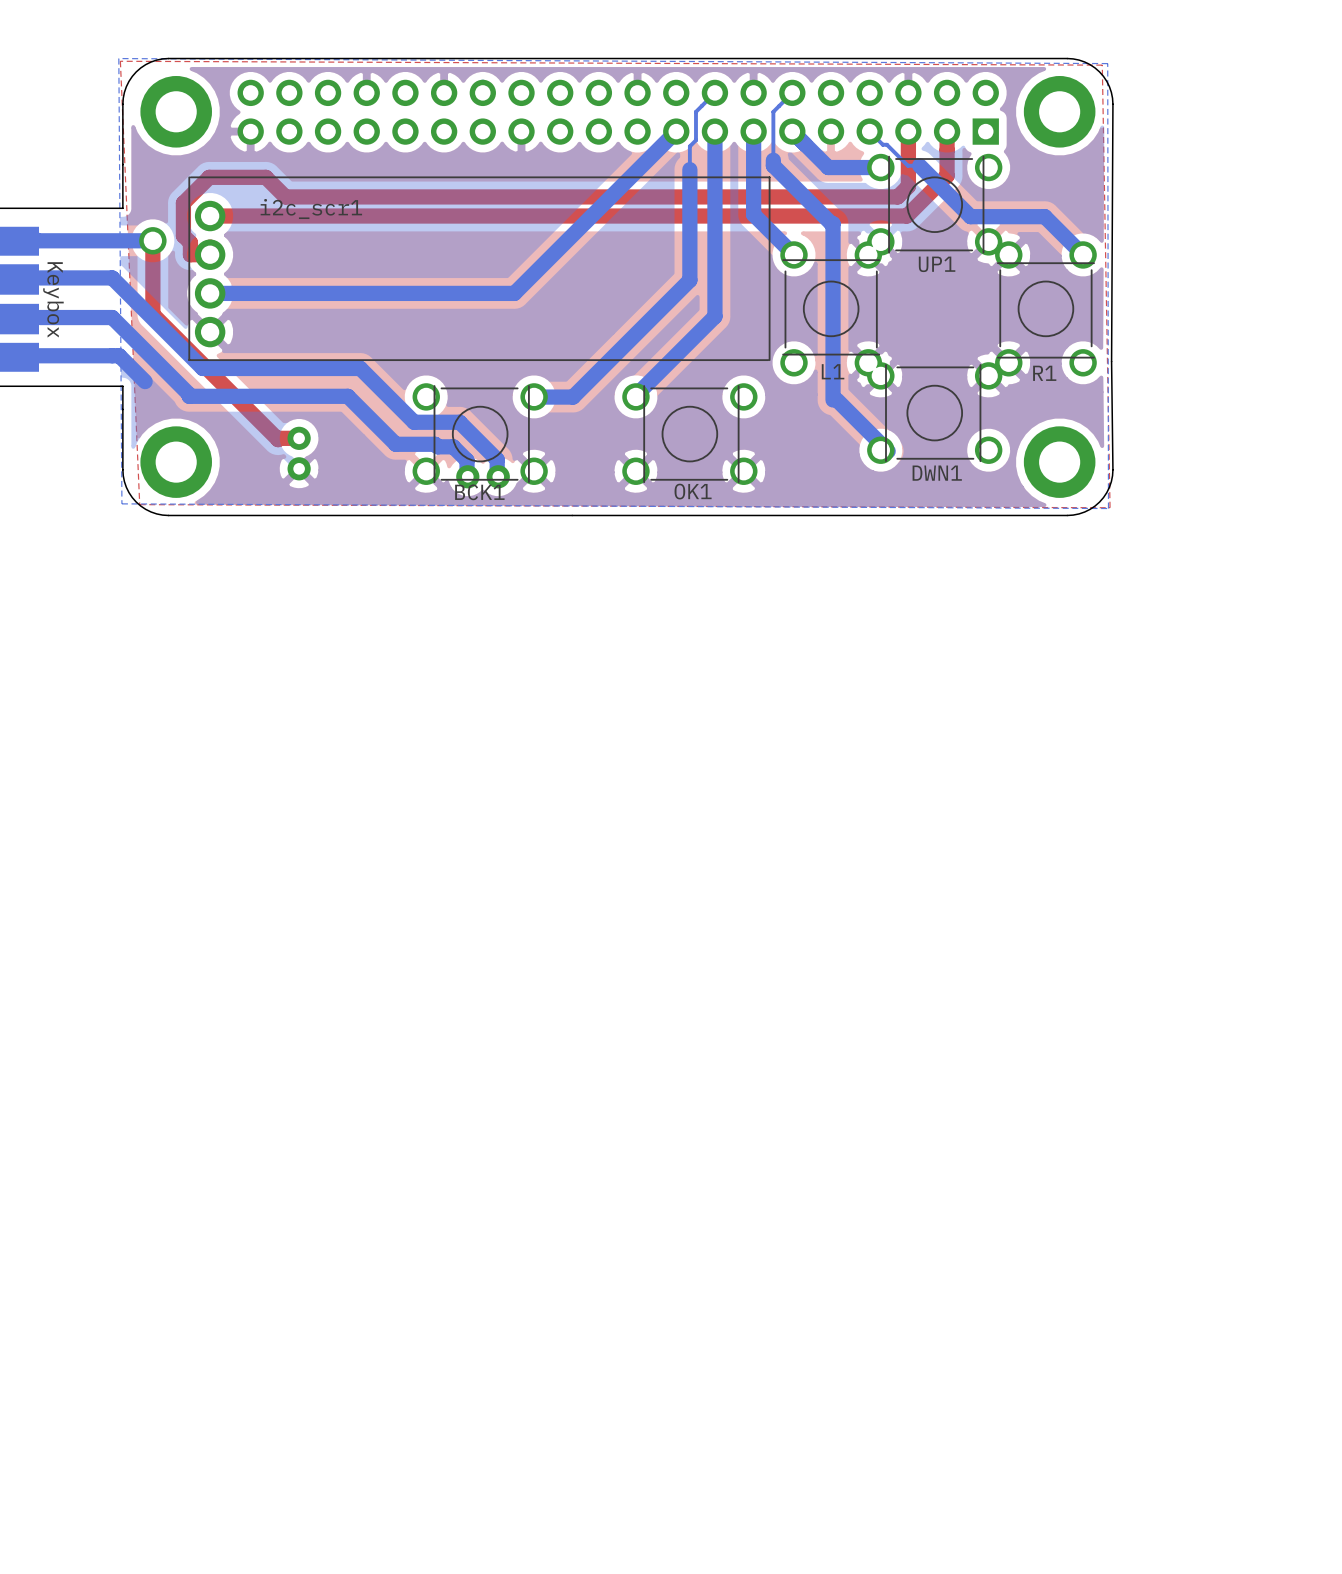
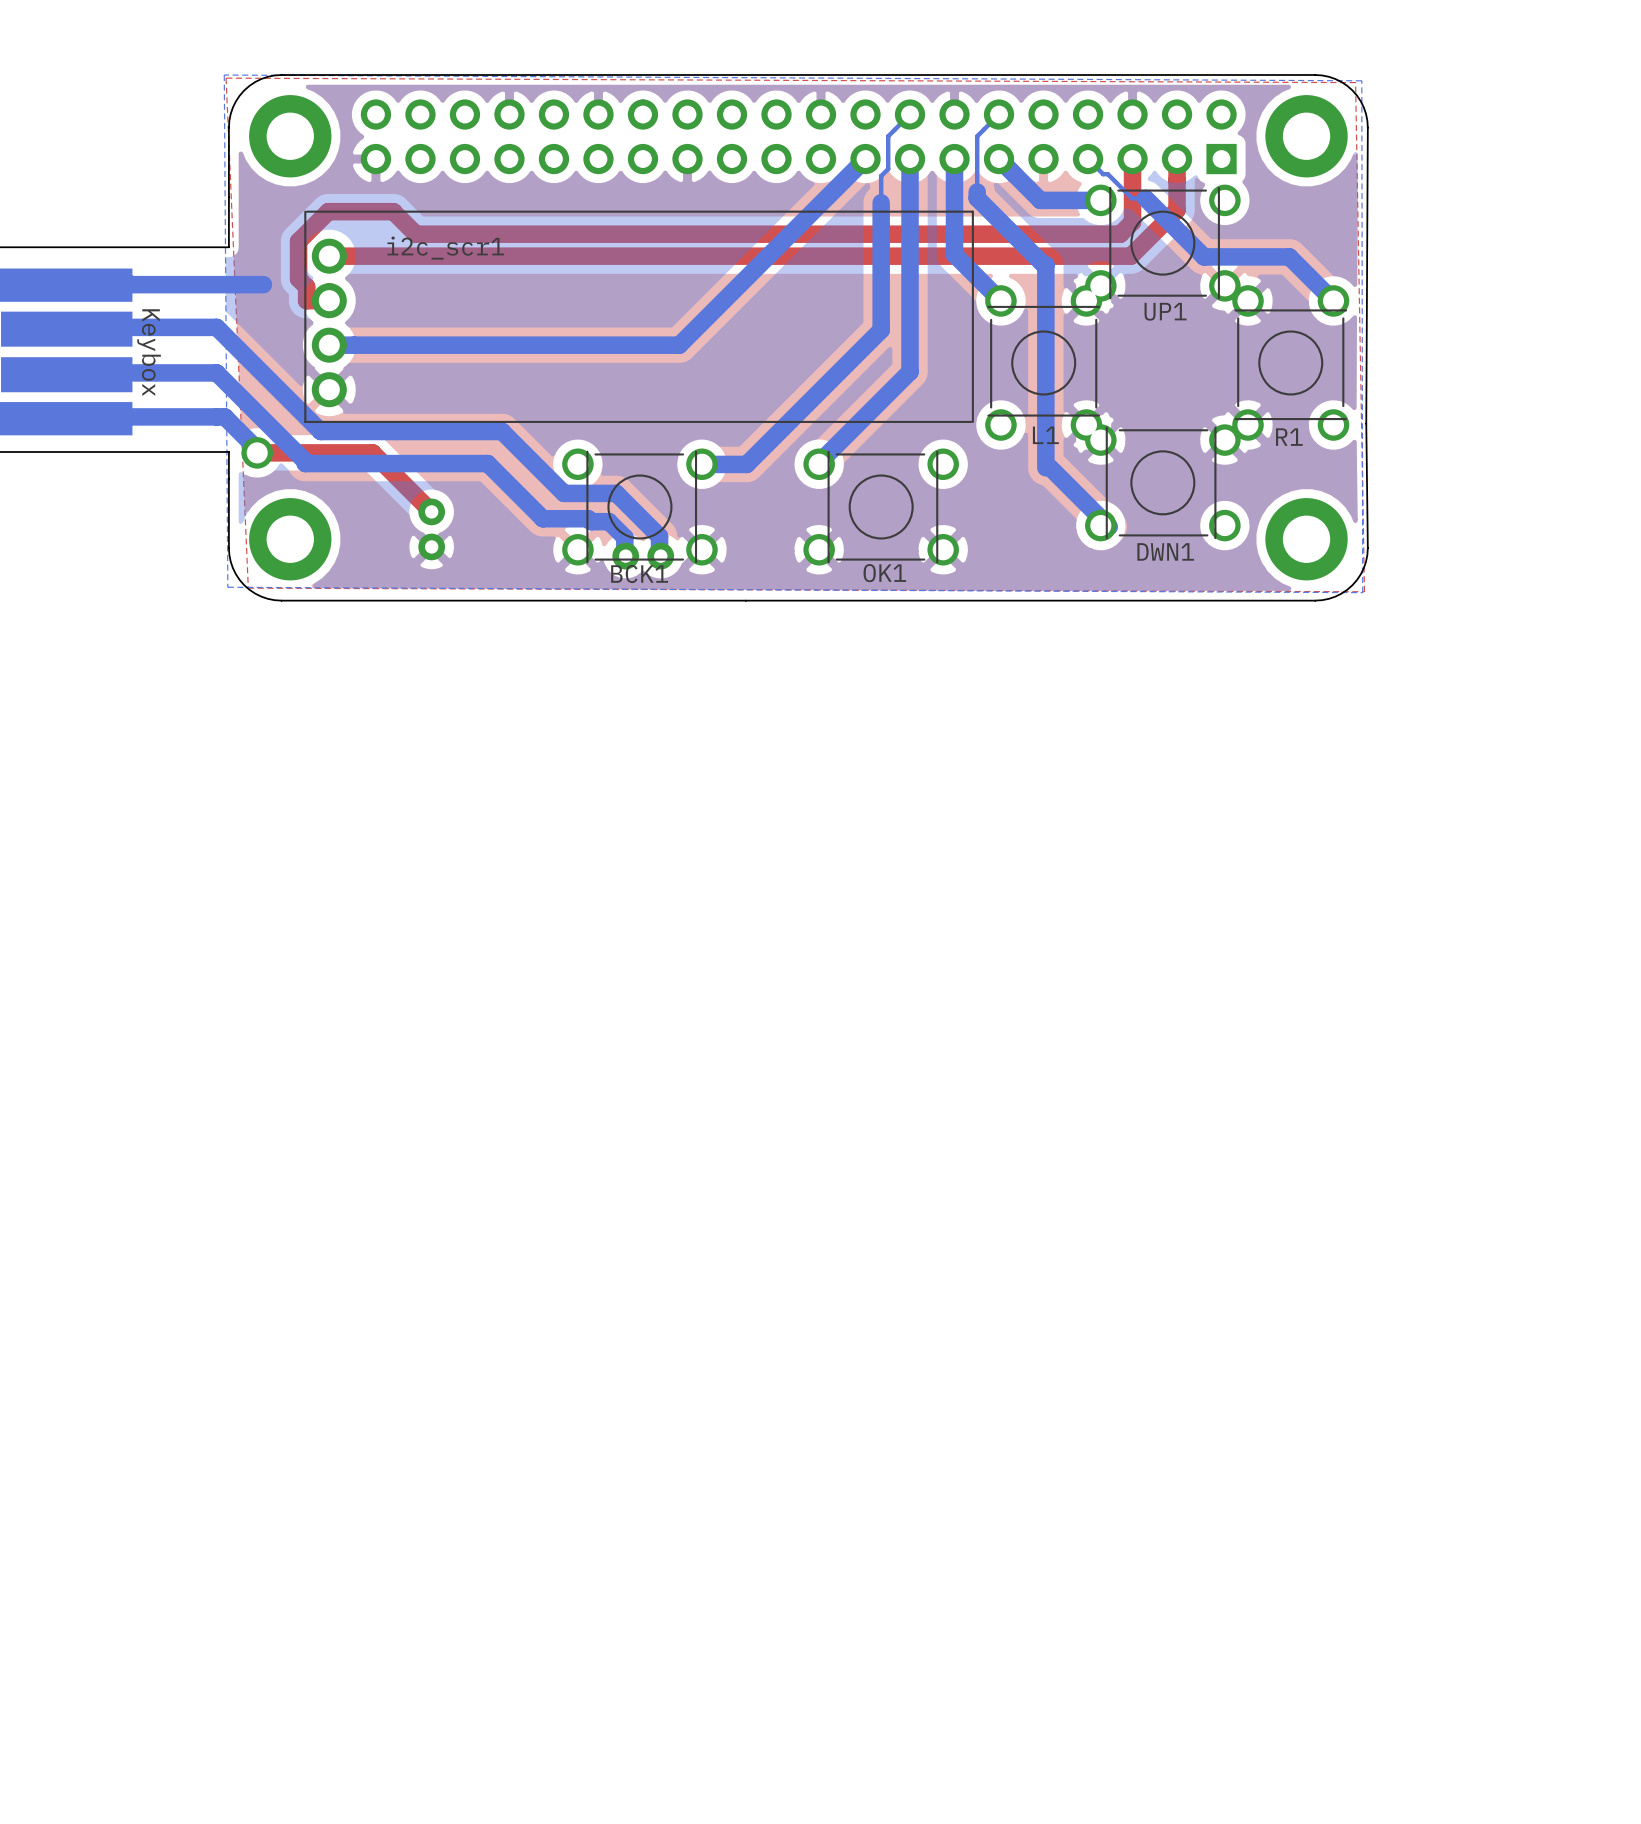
top track: (152, 240) (152, 314) (278, 439) (299, 438) -> (257, 452) (372, 452) (431, 511)
via: (152, 240) -> none
via: none -> (257, 452)

